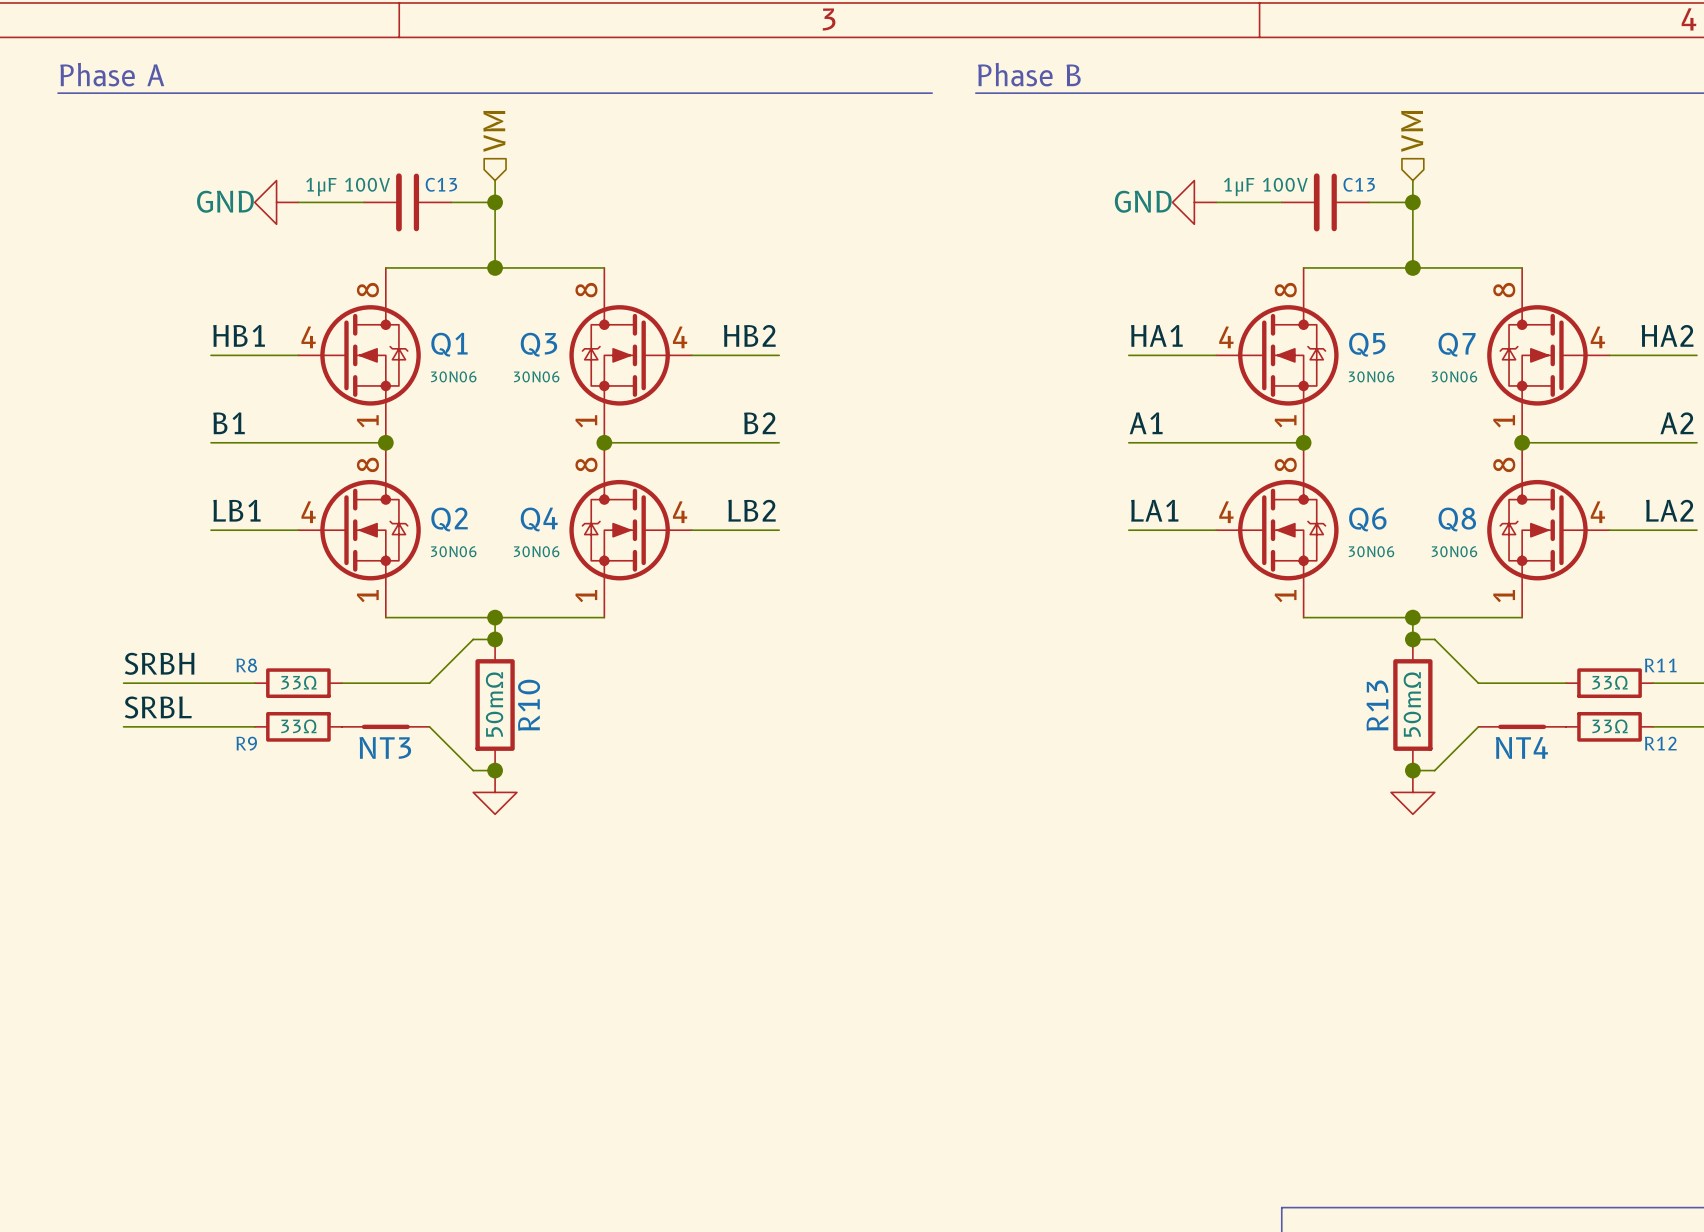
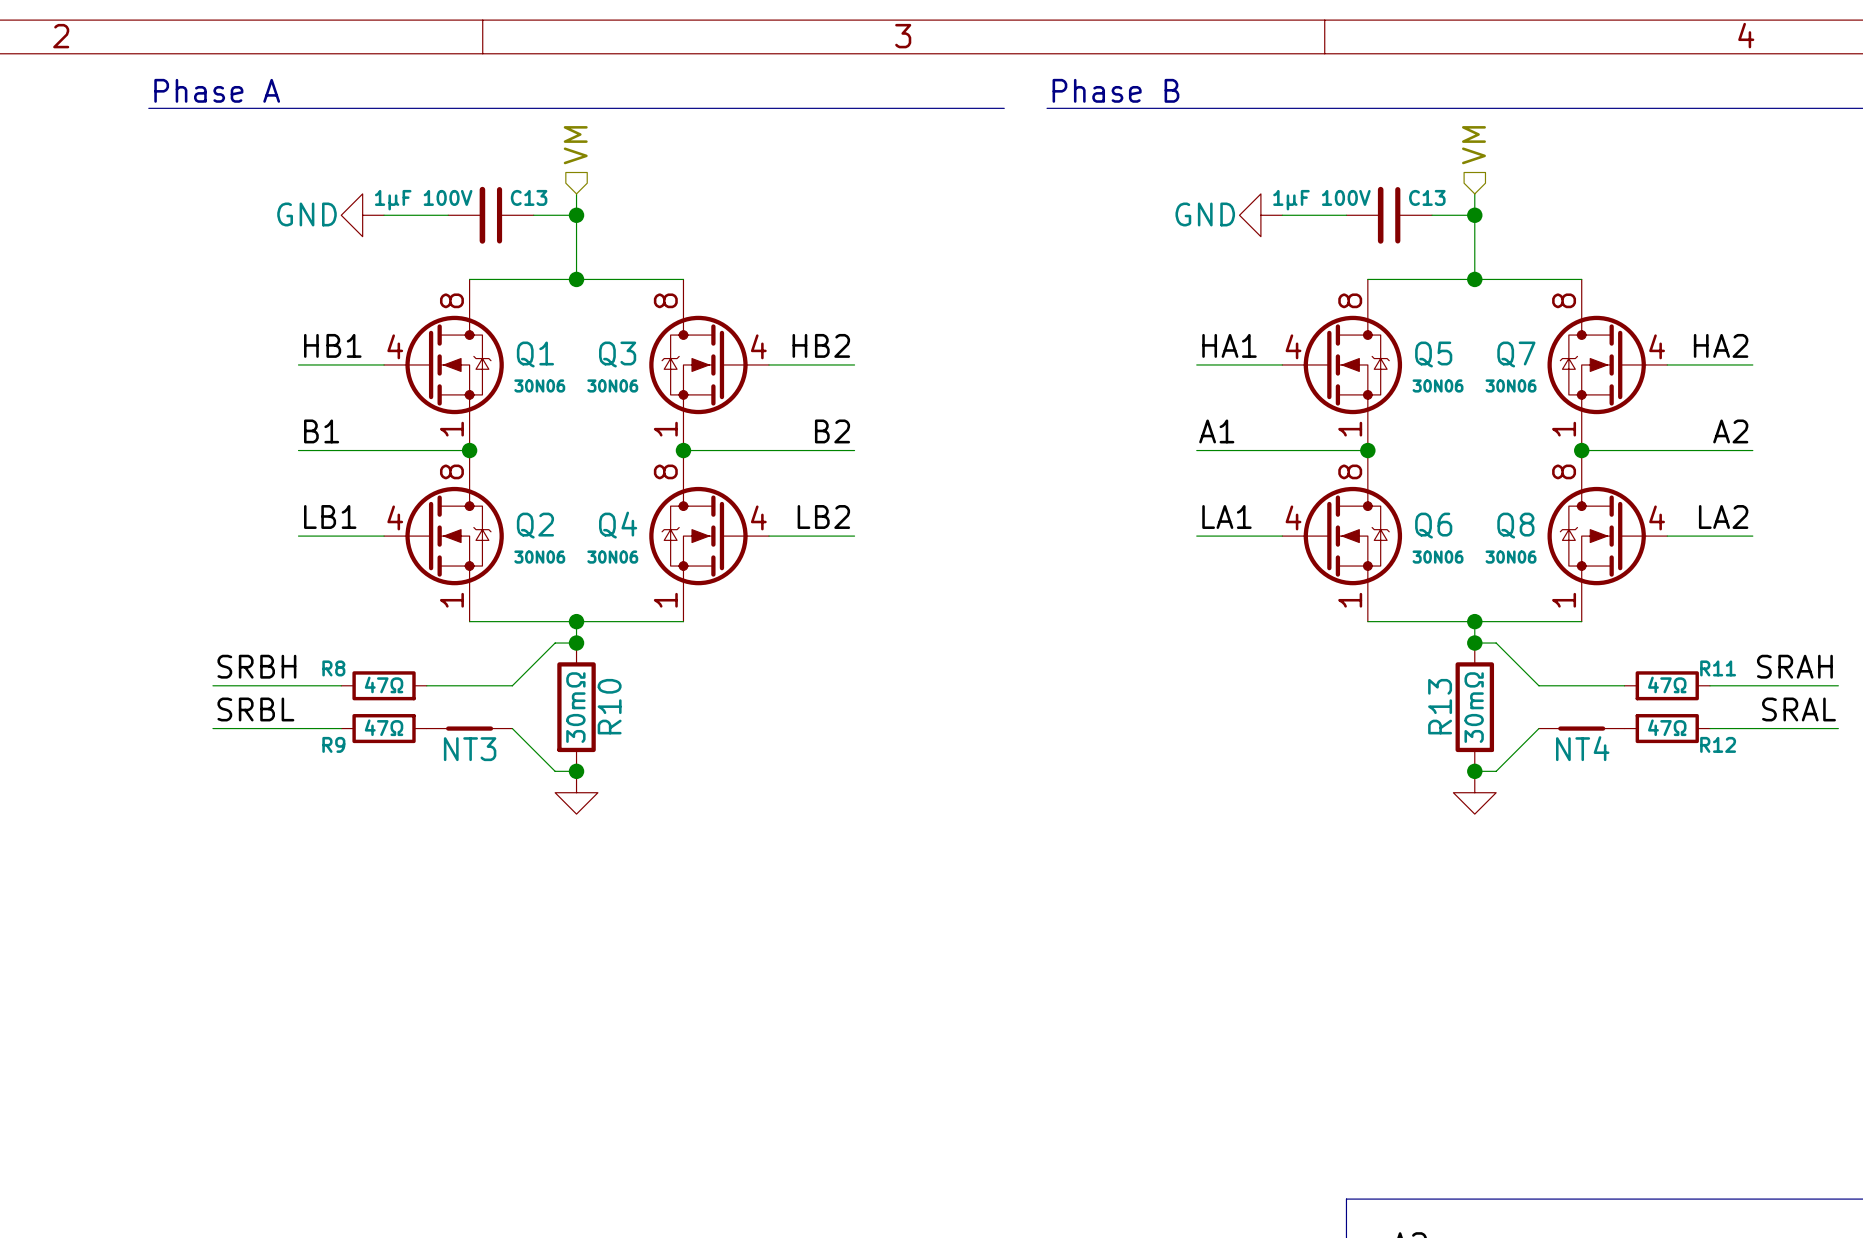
R8 value: 33Ω (298, 682) -> 47Ω (384, 684)
R11 value: 33Ω (1609, 682) -> 47Ω (1667, 684)
R10 value: 50mΩ (494, 704) -> 30mΩ (575, 707)
R13 value: 50mΩ (1412, 704) -> 30mΩ (1474, 707)
R9 value: 33Ω (298, 726) -> 47Ω (384, 727)
R12 value: 33Ω (1609, 726) -> 47Ω (1667, 727)

